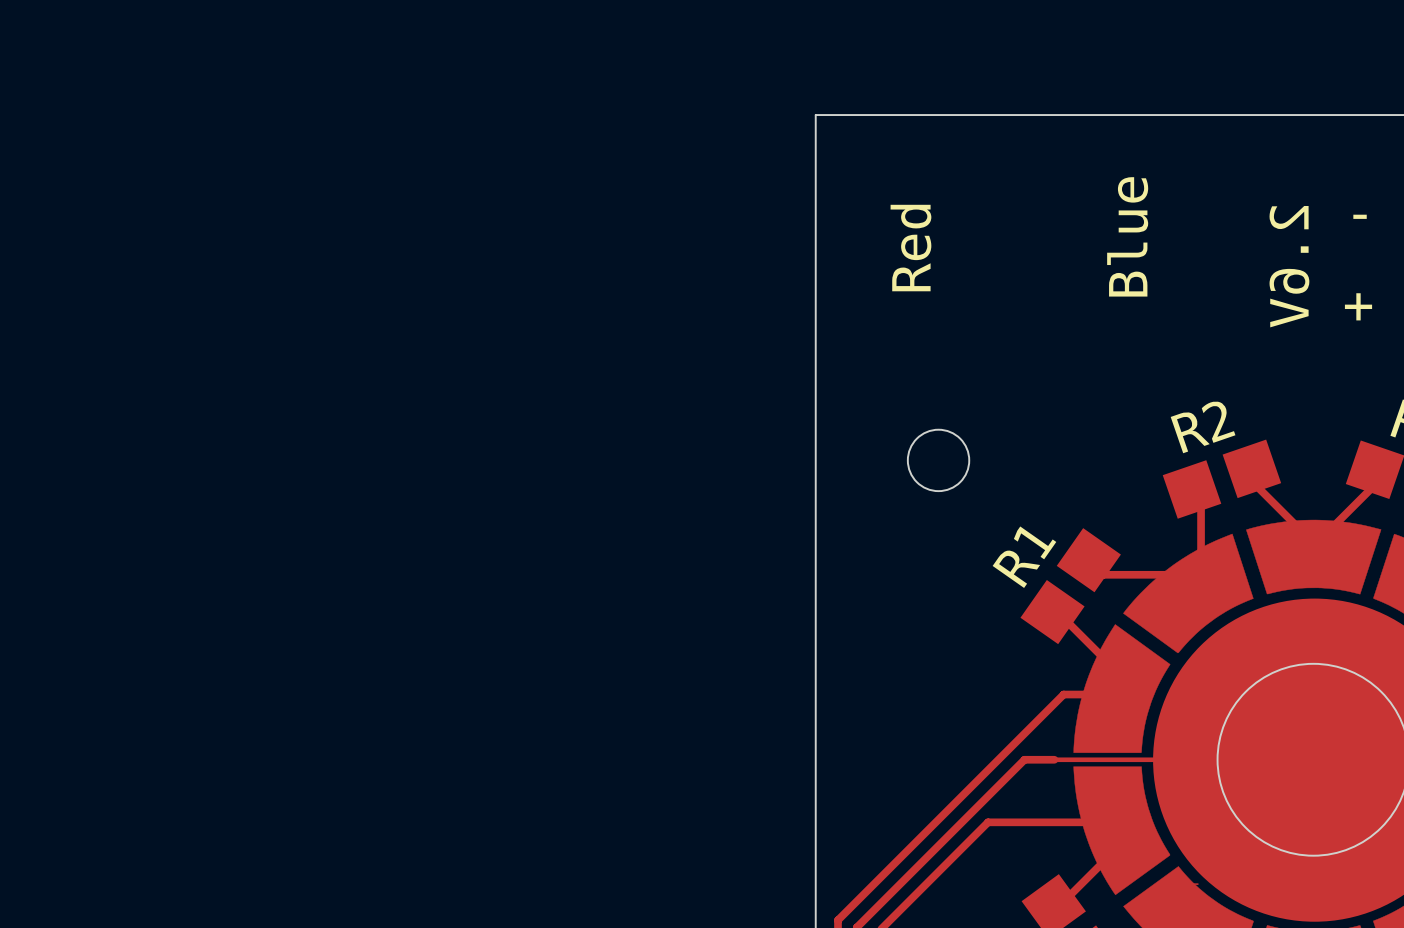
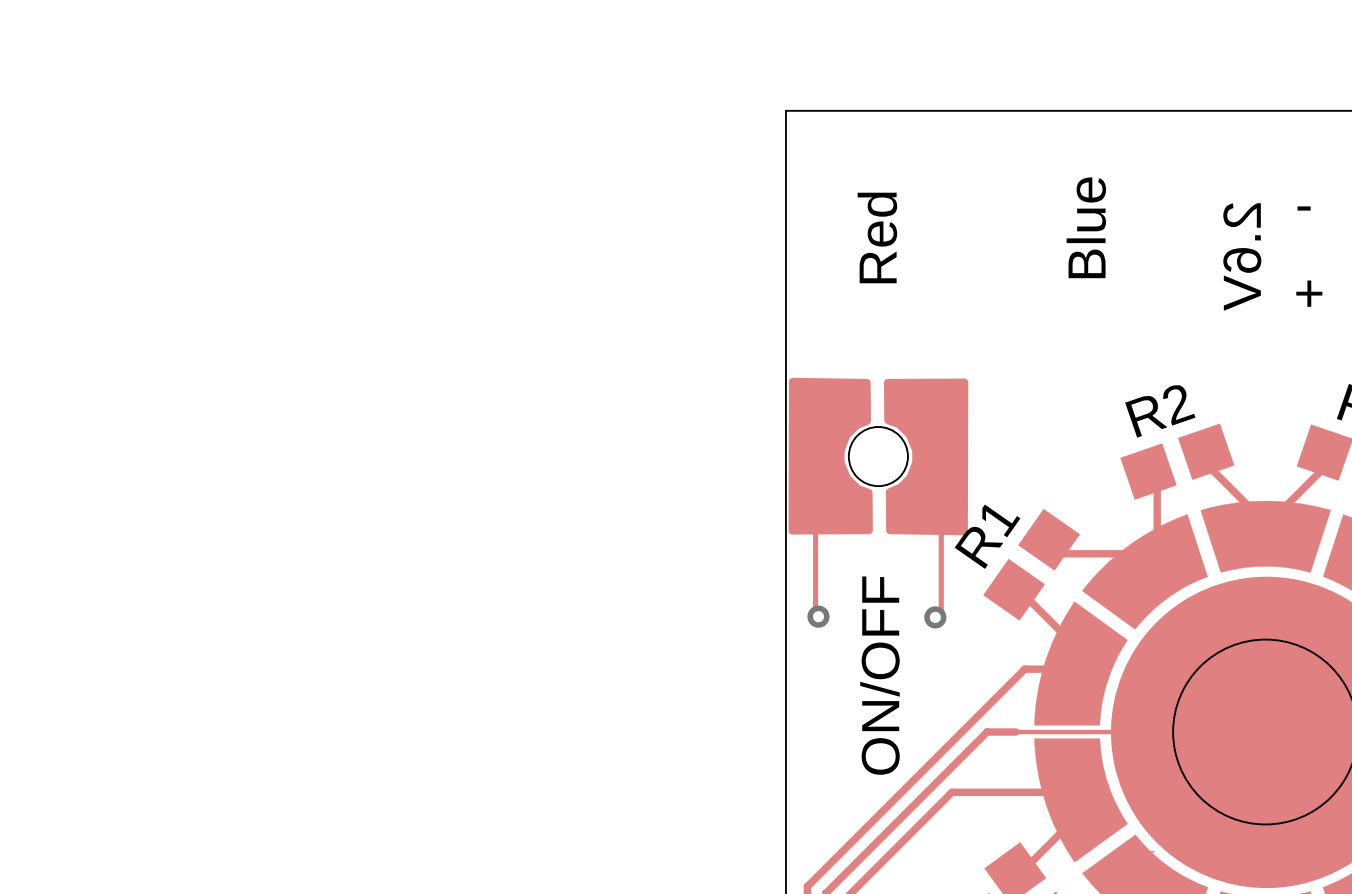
round board edge: [906, 428, 971, 493] -> none
track: none -> (815, 456) (815, 613) (818, 616)
ON/OFF: none -> (878, 456)
track: none -> (941, 456) (941, 611) (935, 617)
via: none -> (818, 616)
via: none -> (935, 617)

